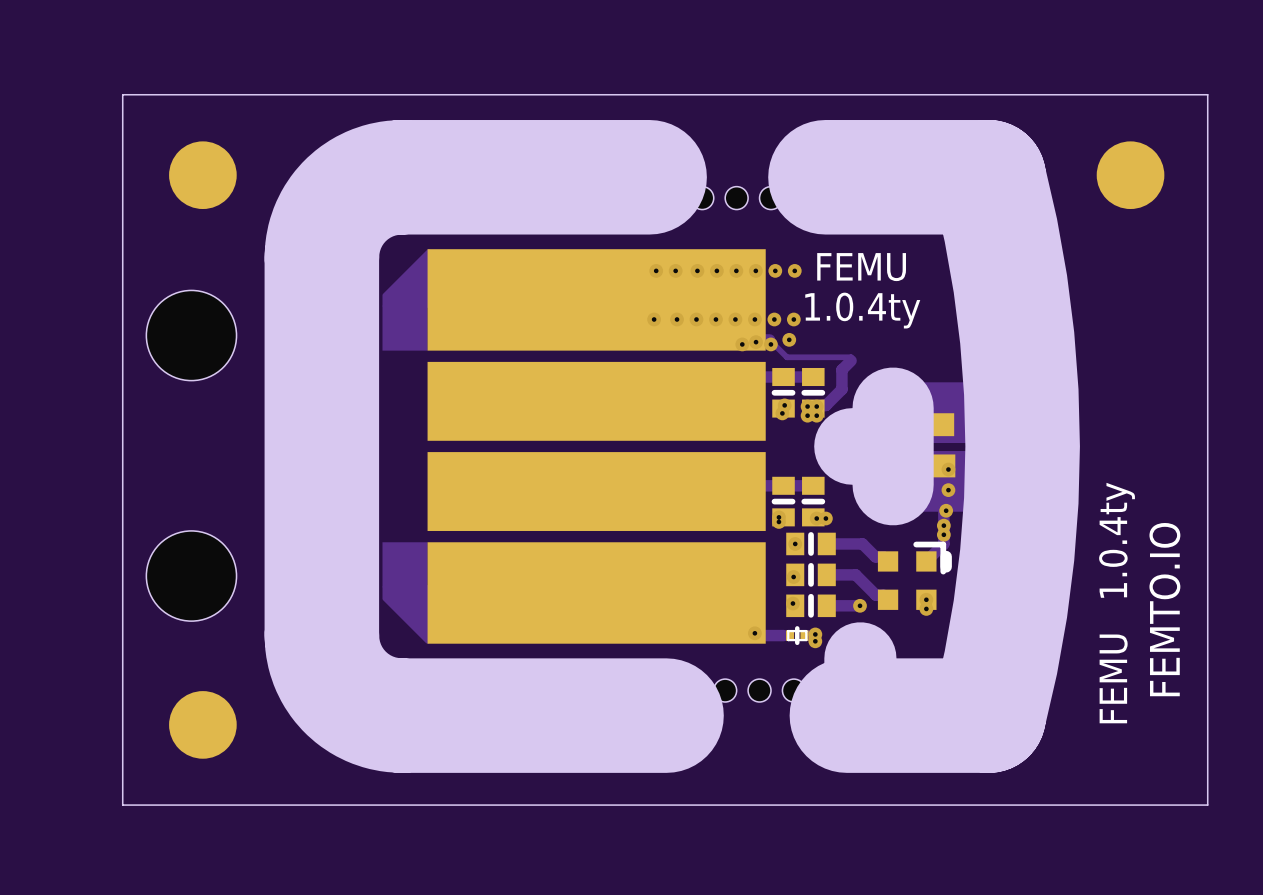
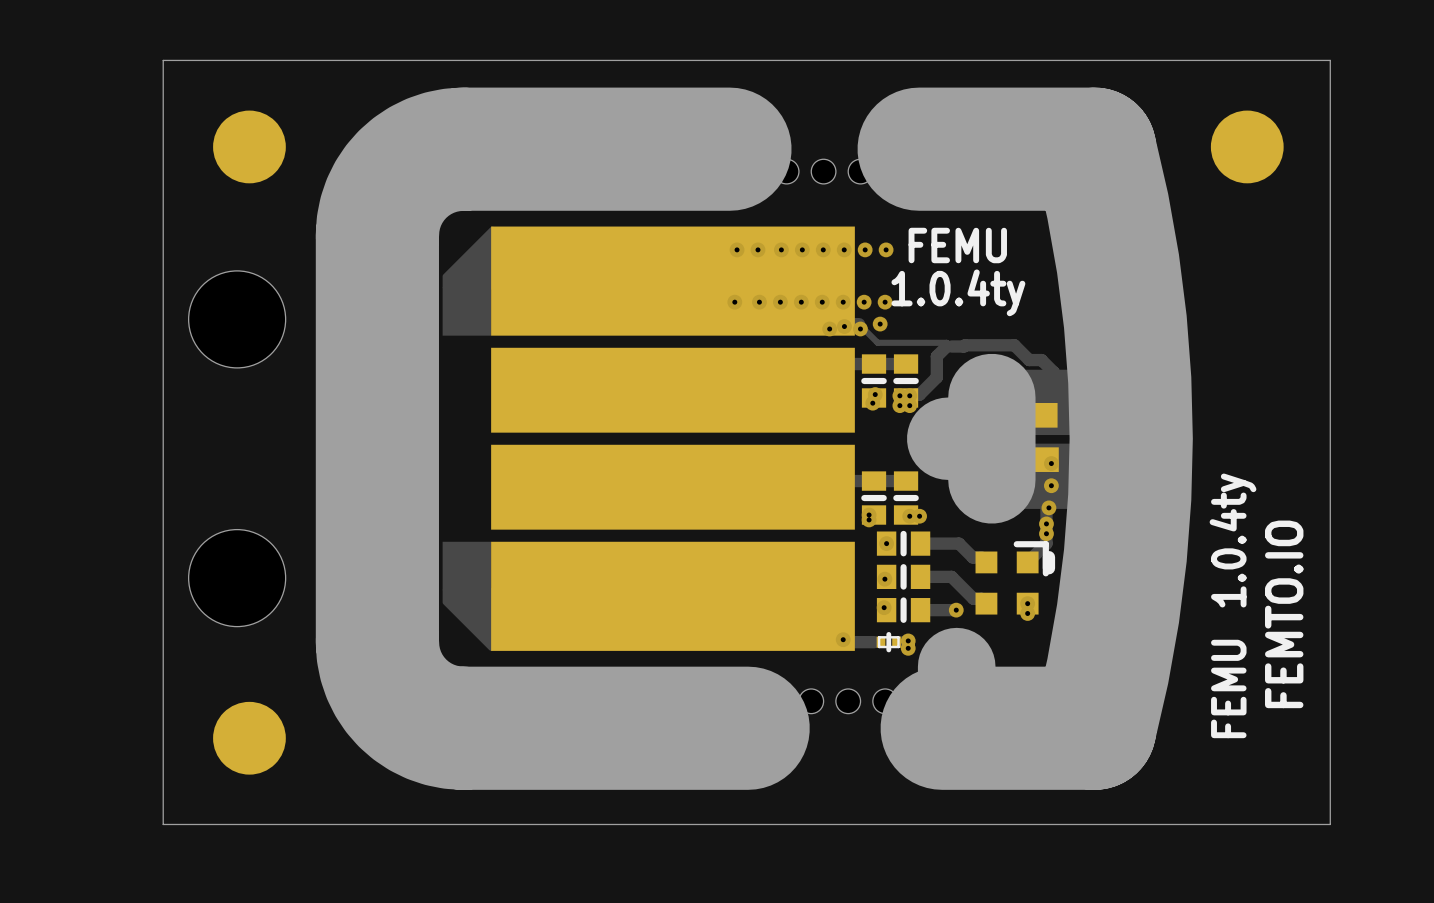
track: none -> (951, 346) (1014, 345) (1029, 360) (1041, 360) (1053, 372) (1053, 406) (1045, 415) (1045, 397) (1052, 389)

